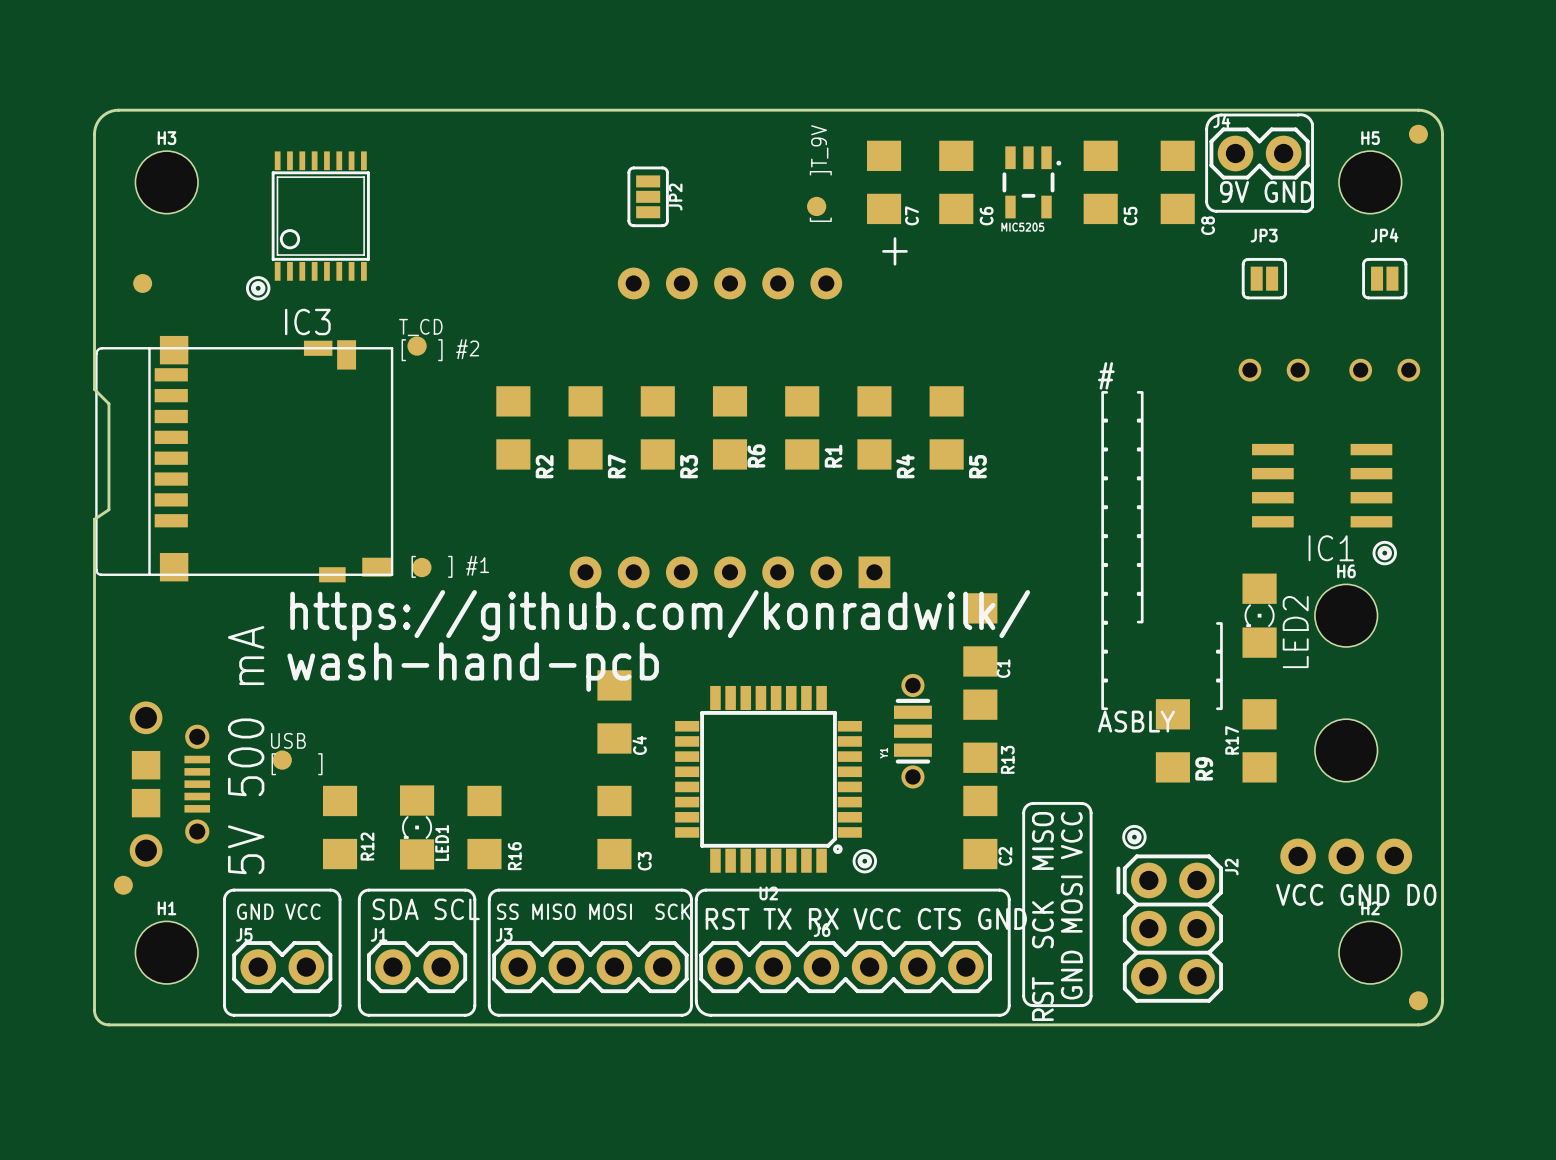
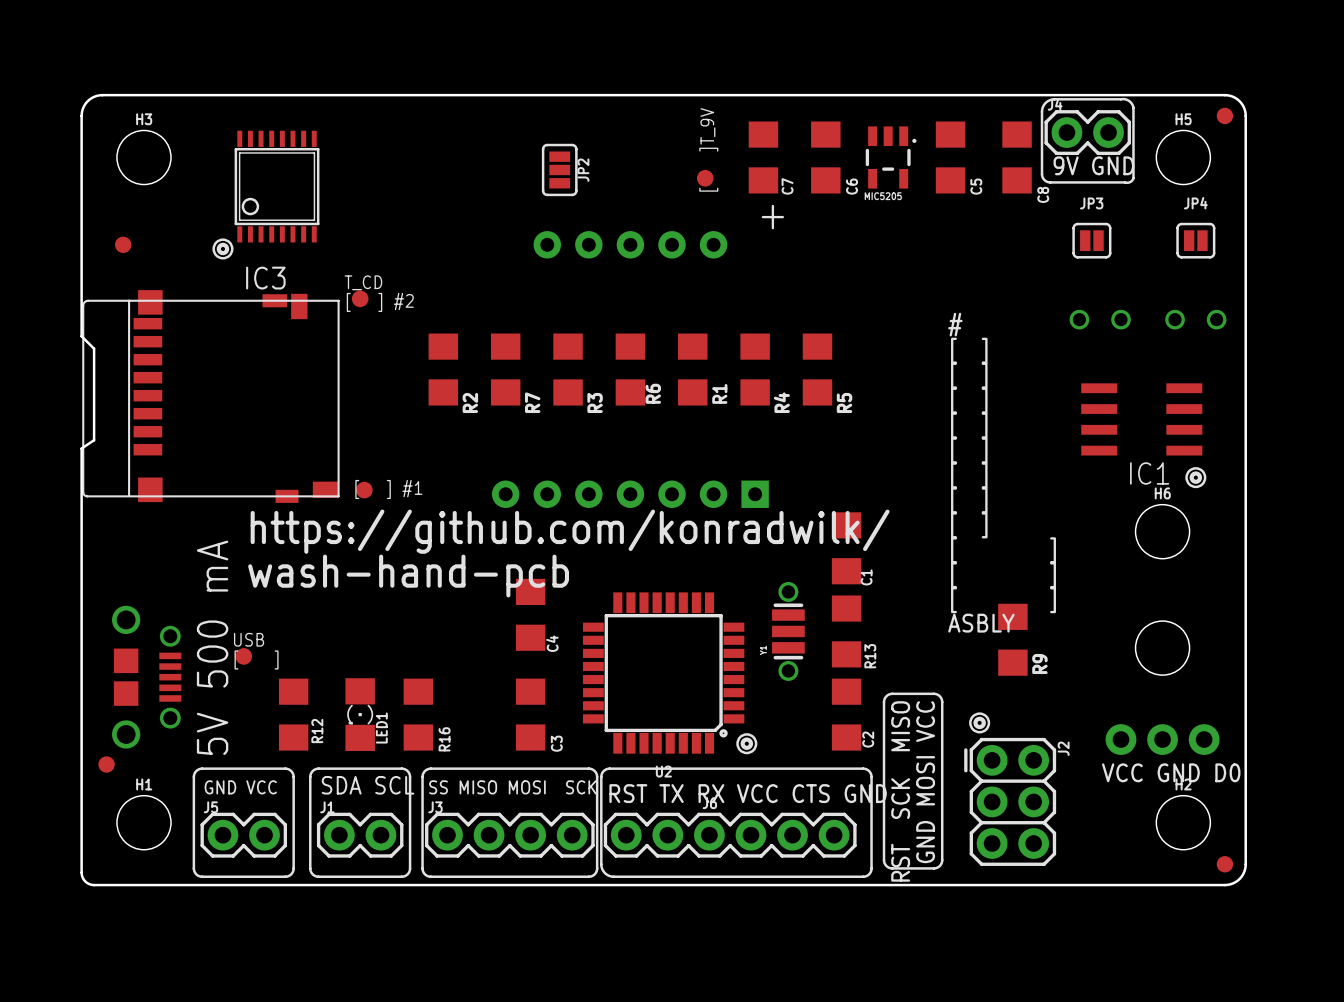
LED2: (1259, 615) -> none
R17: (1259, 740) -> none

